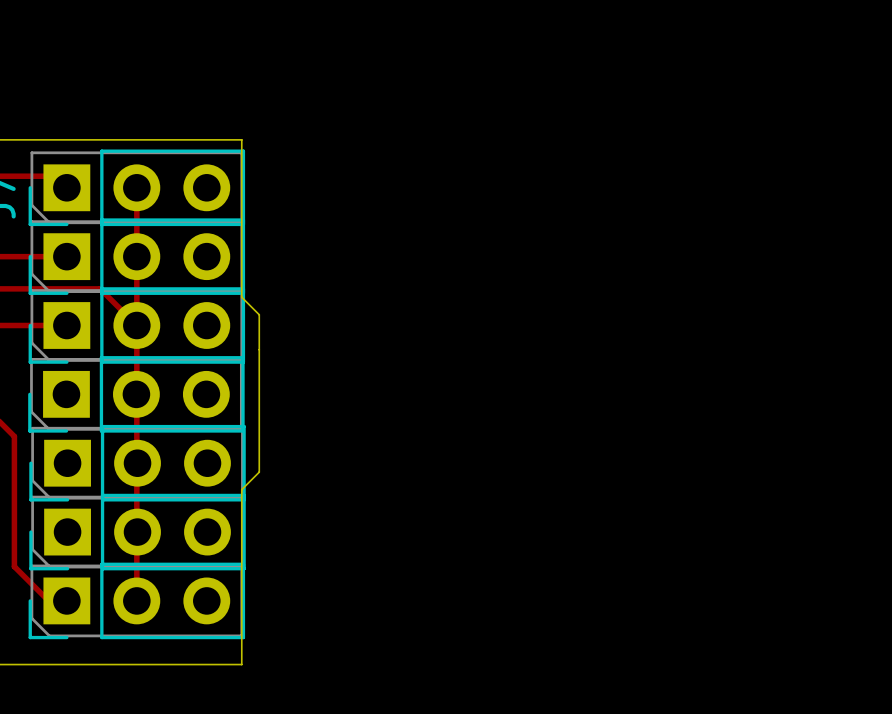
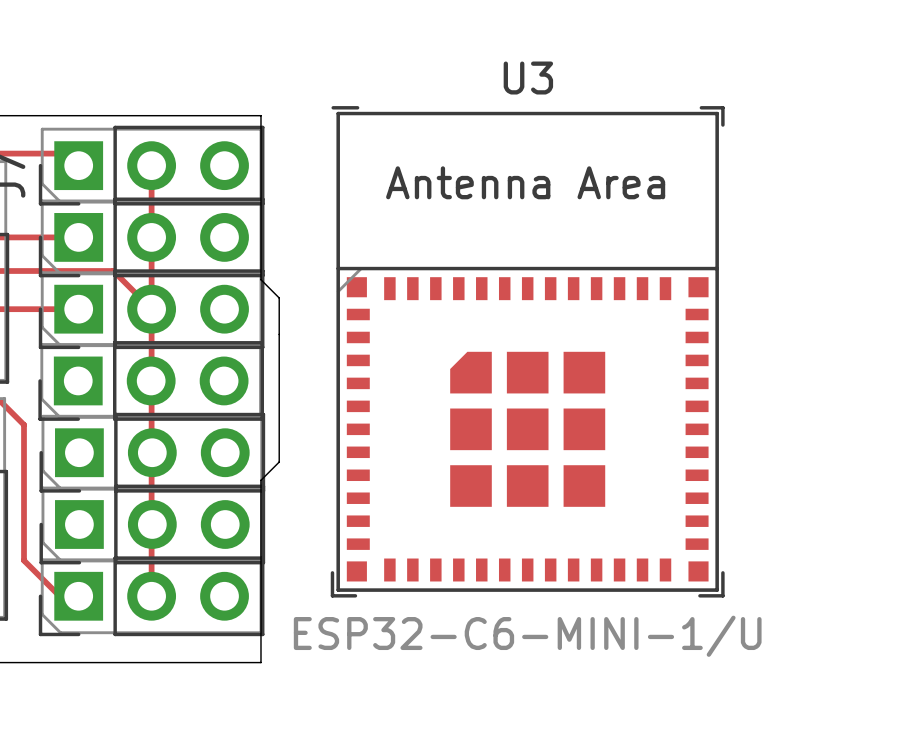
U3: none -> ESP32-C6-MINI-1/U (527, 351)

